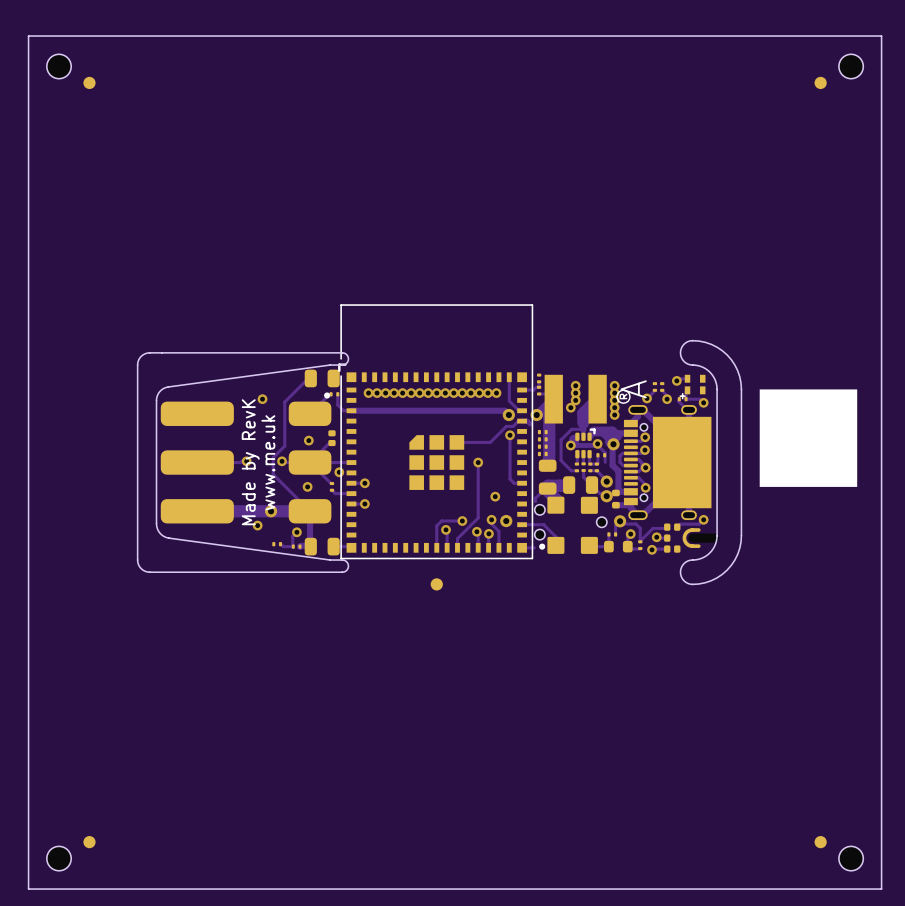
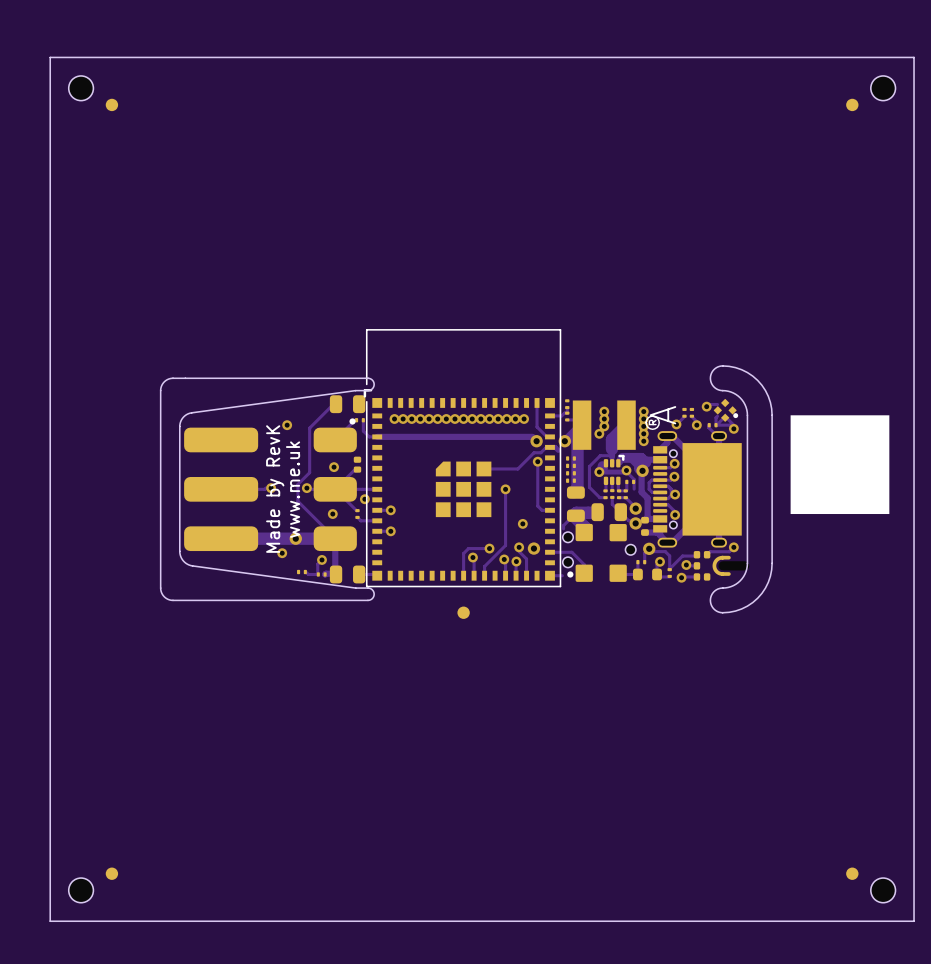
part footprint: [679, 374, 706, 400] -> [713, 399, 739, 422]
track: none -> (723, 417) (716, 425)
track: none -> (726, 417) (733, 425)

